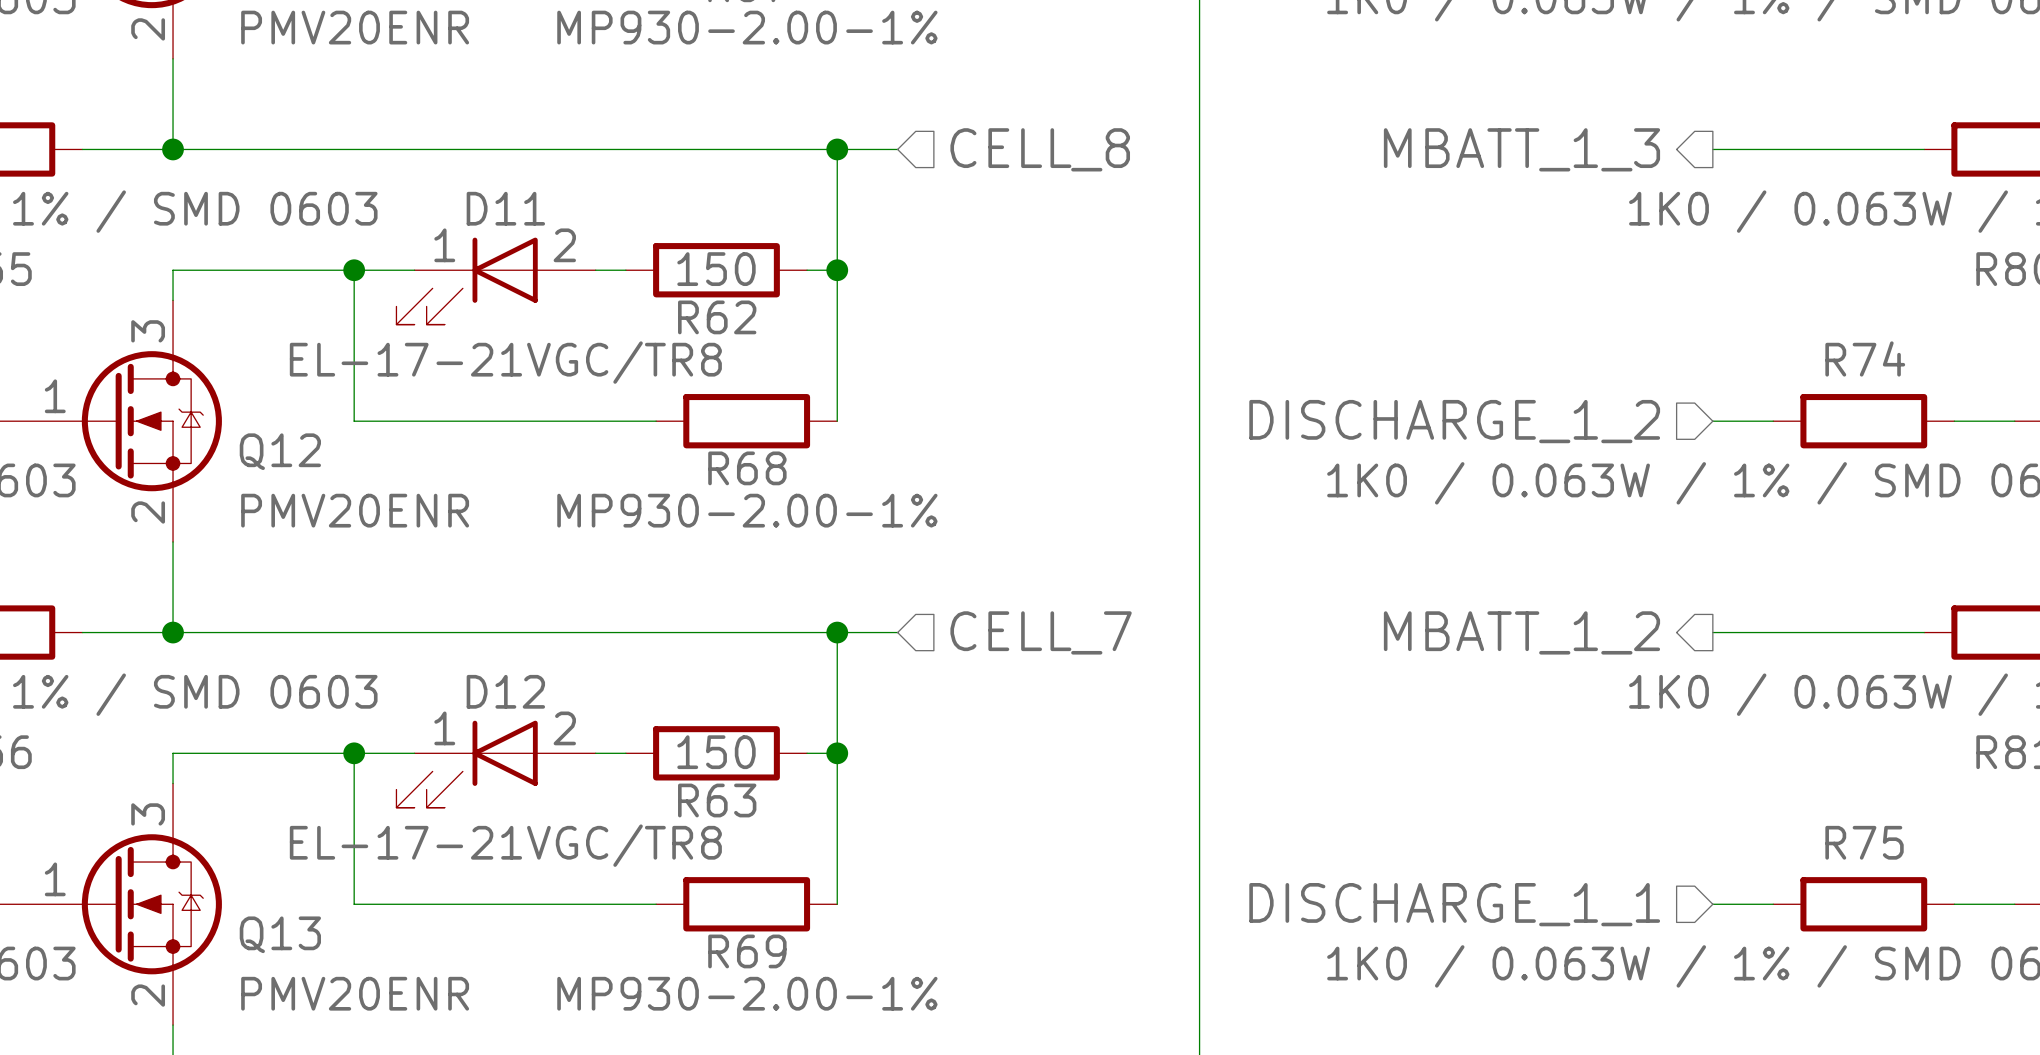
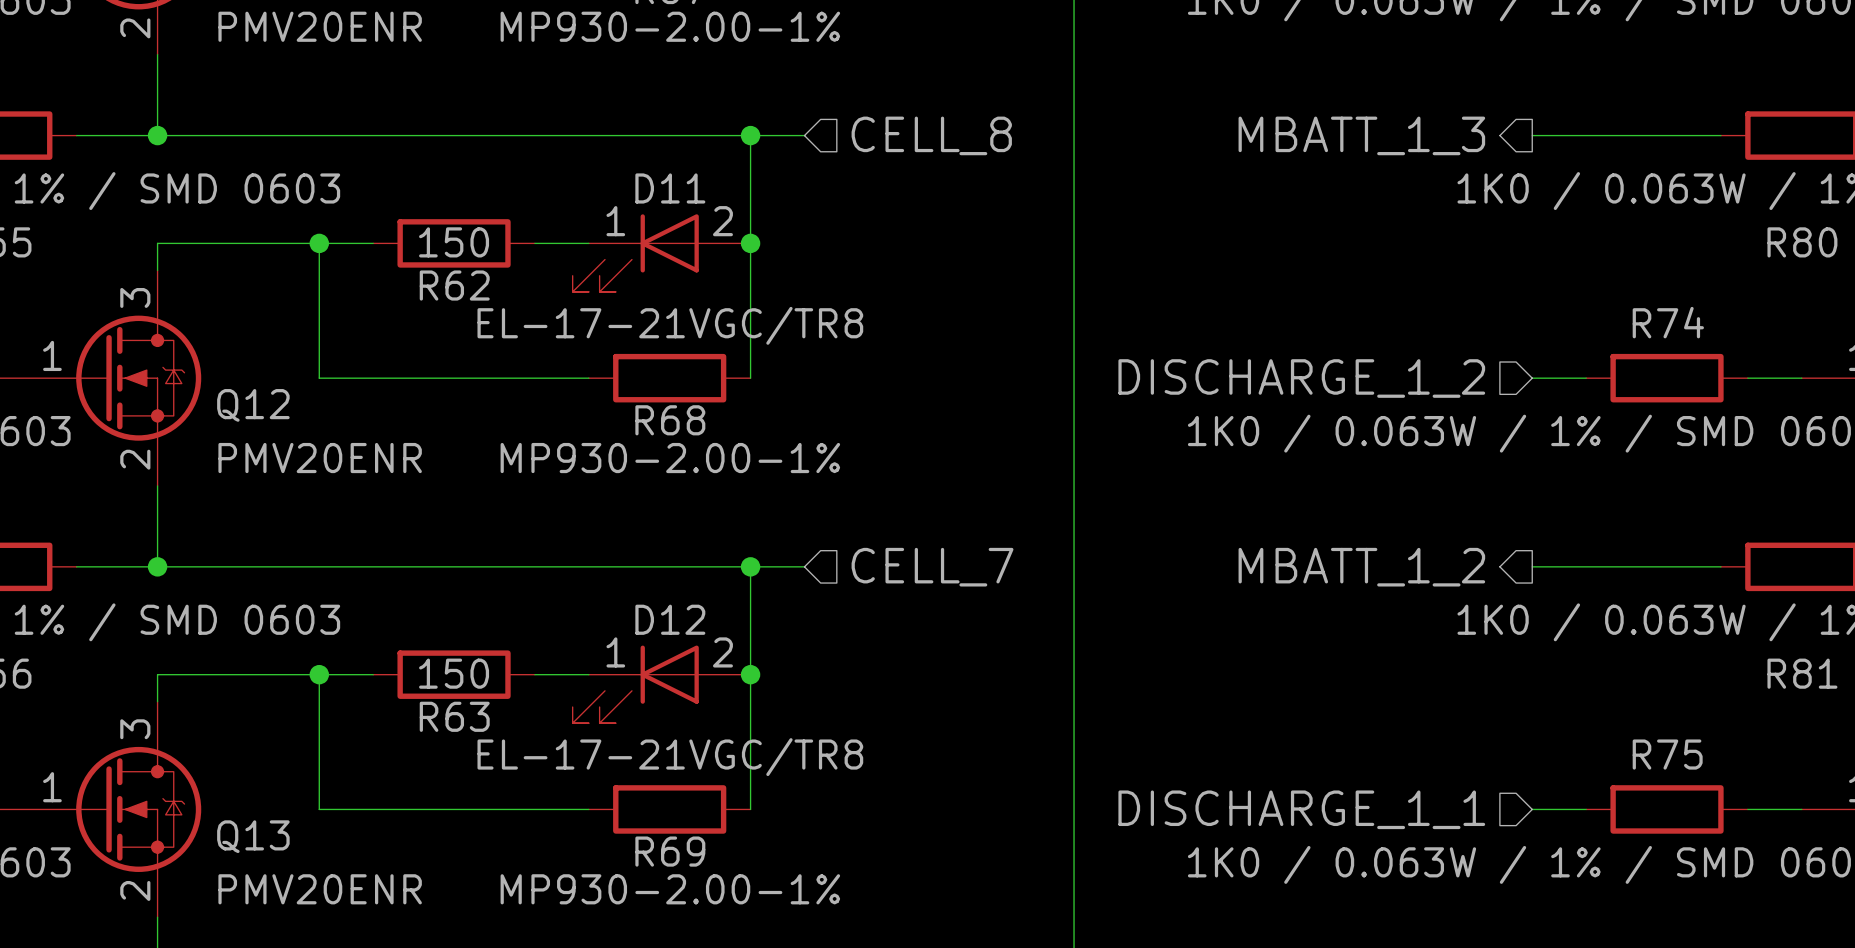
R62 position: (716, 270) -> (454, 243)
D11 position: (496, 281) -> (661, 253)
R63 position: (716, 753) -> (454, 674)
D12 position: (496, 764) -> (661, 684)

